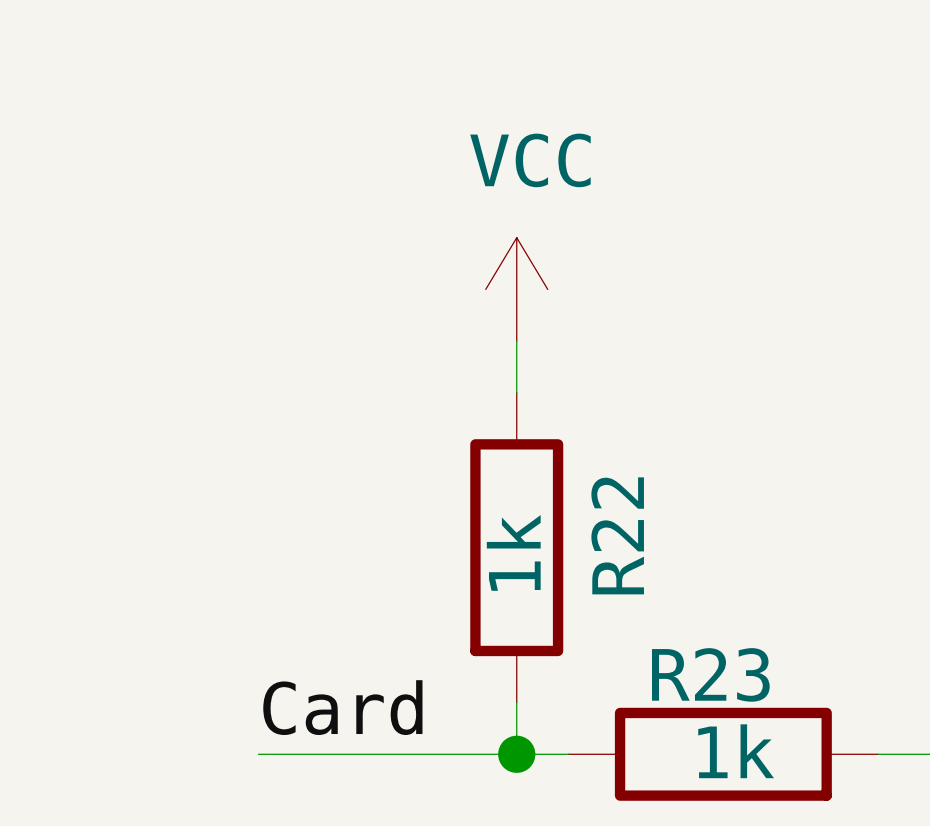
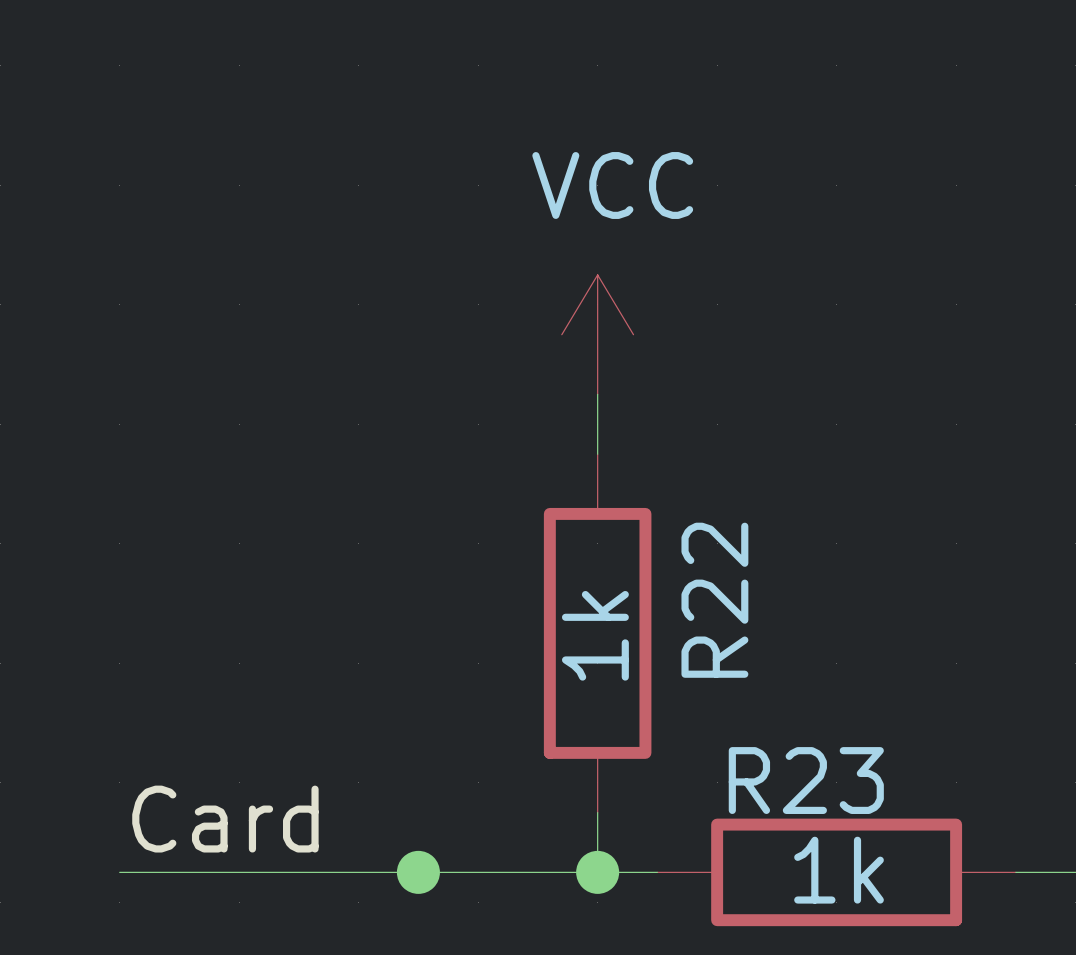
label position: Card (342, 707) -> Card (225, 819)
wire: none -> (119, 872) (298, 872)
junction: none -> (418, 872)

